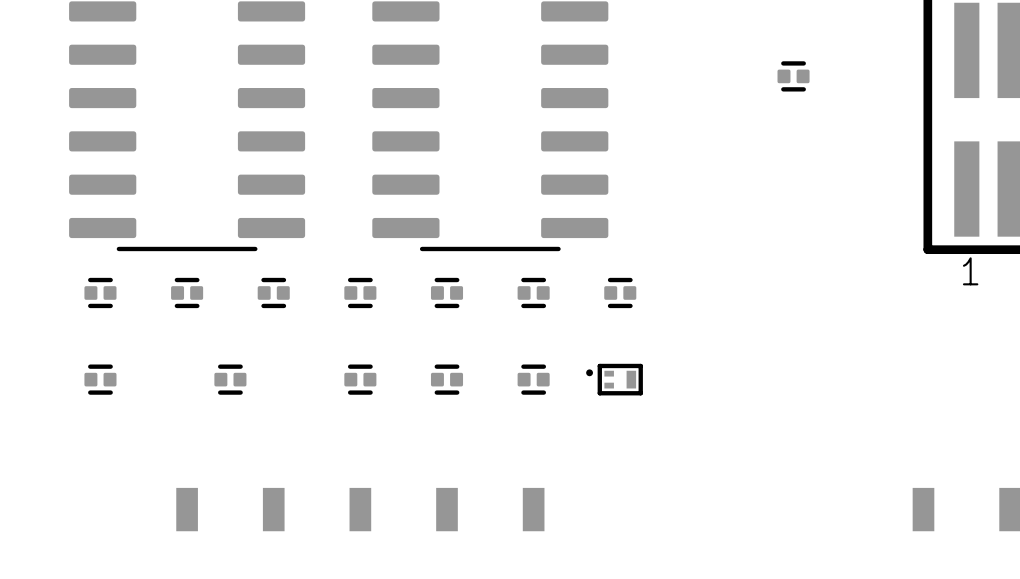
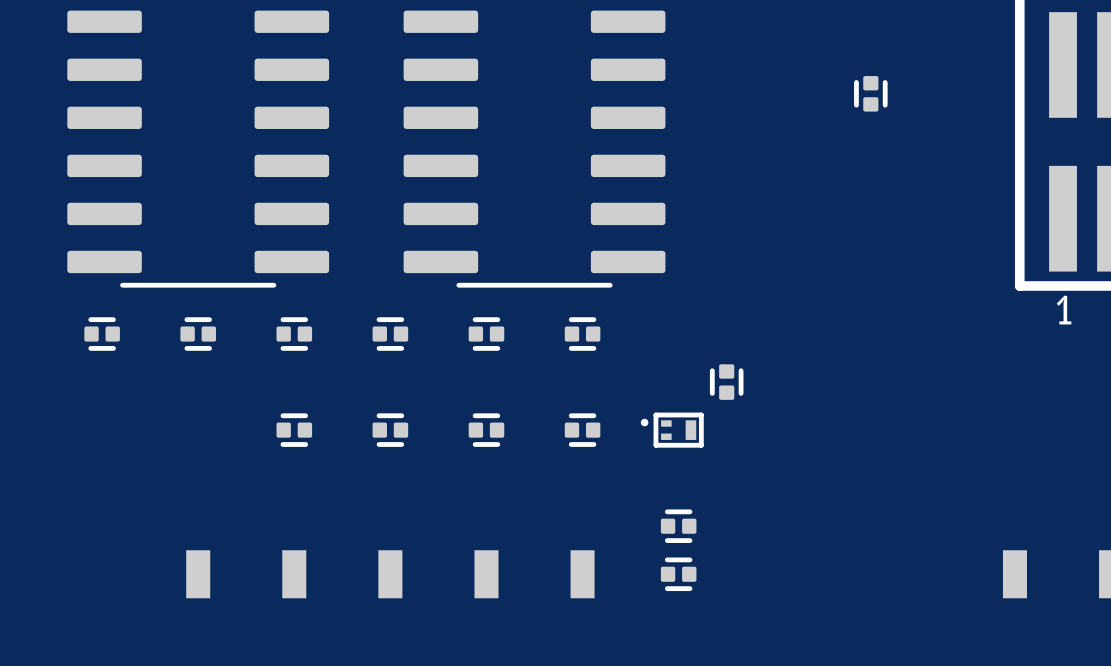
part rotation: 0° (793, 76) -> 90° clockwise (870, 93)
part rotation: 0° (620, 292) -> 90° clockwise (726, 382)
part position: (620, 292) -> (726, 382)
part: (100, 379) -> none
part position: (230, 379) -> (294, 430)
part: none -> (678, 526)
part: none -> (678, 574)

